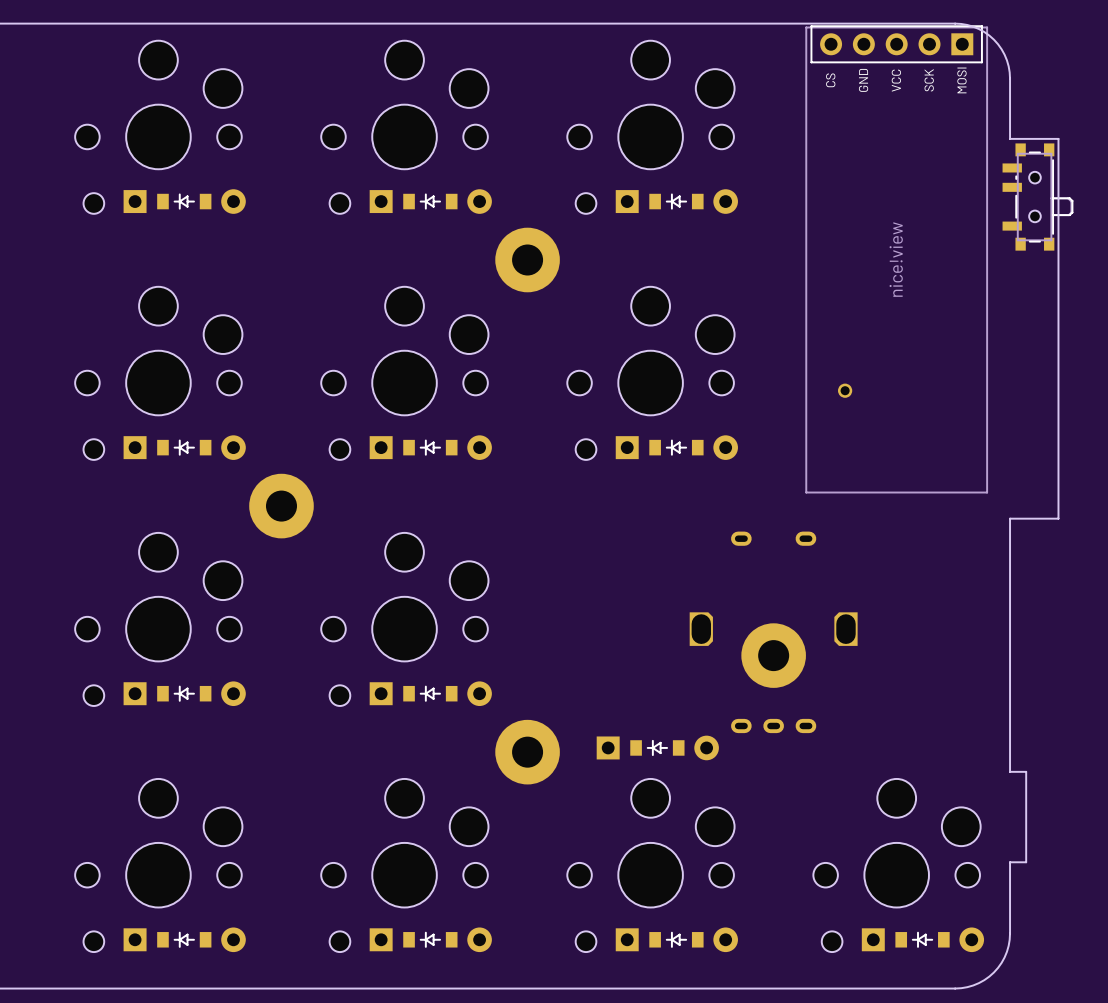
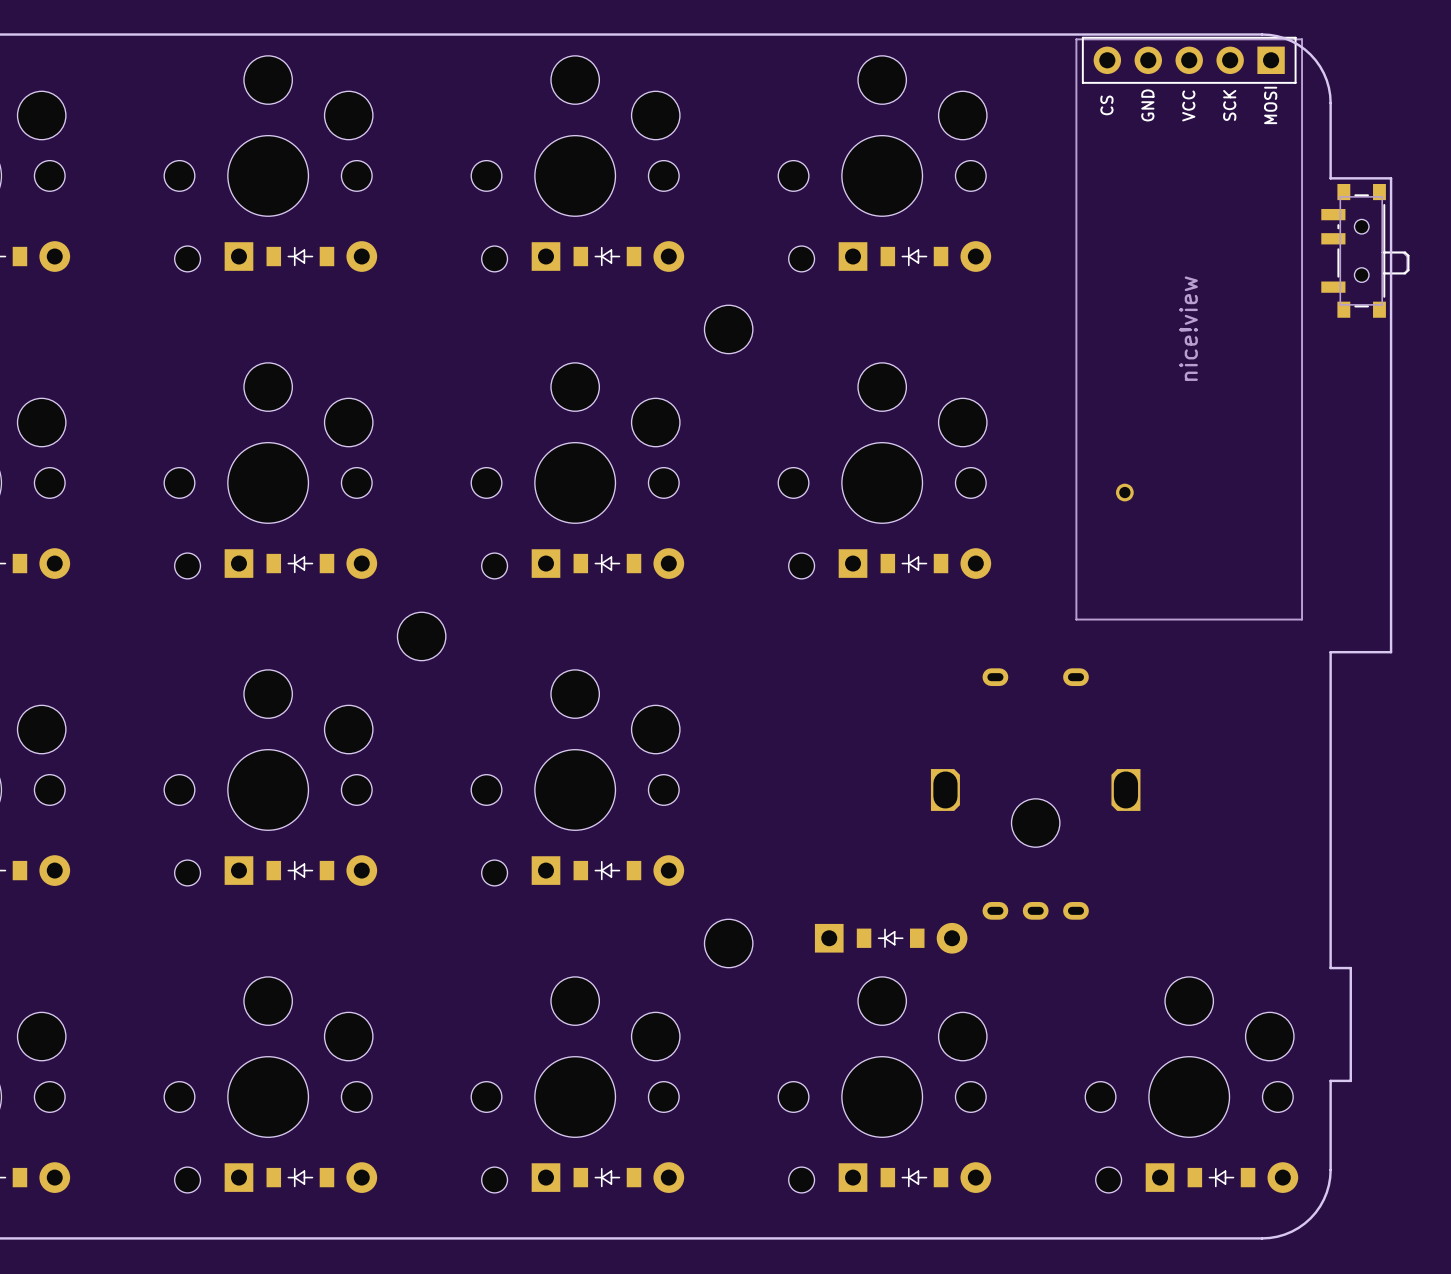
part footprint: [495, 227, 560, 293] -> [704, 305, 753, 354]
part footprint: [249, 473, 314, 539] -> [397, 612, 446, 661]
part footprint: [741, 623, 806, 688] -> [1011, 798, 1060, 848]
part footprint: [495, 719, 560, 785] -> [704, 919, 753, 968]

